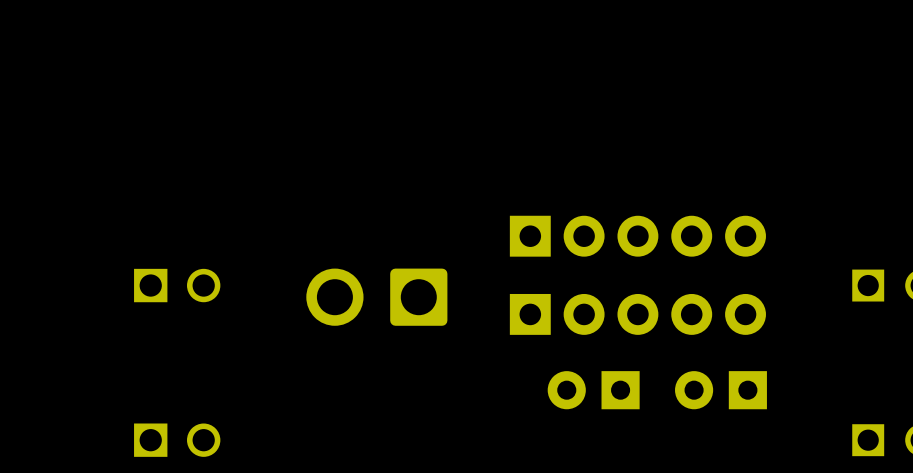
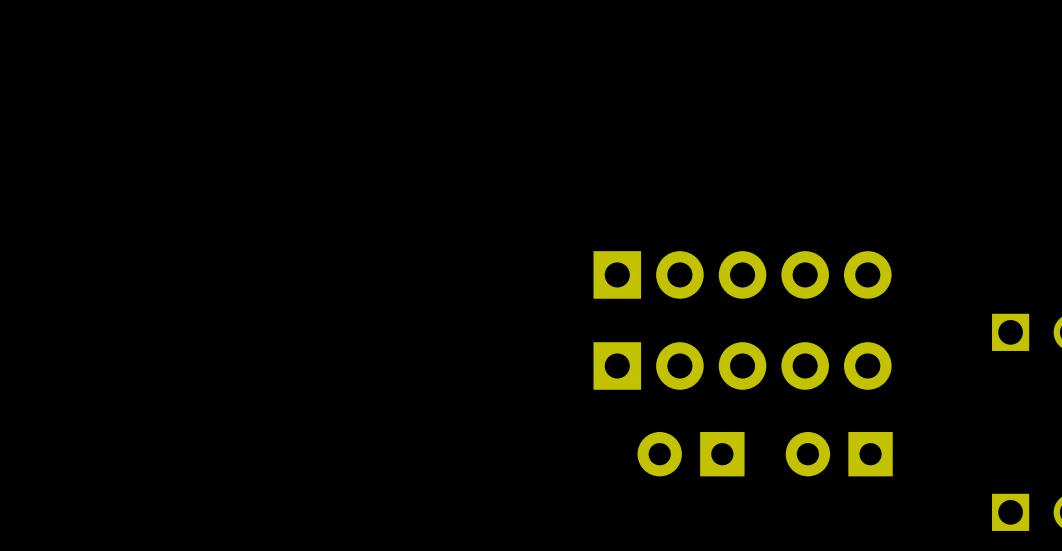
part: (177, 285) -> none
part: (376, 297) -> none
part: (177, 440) -> none

